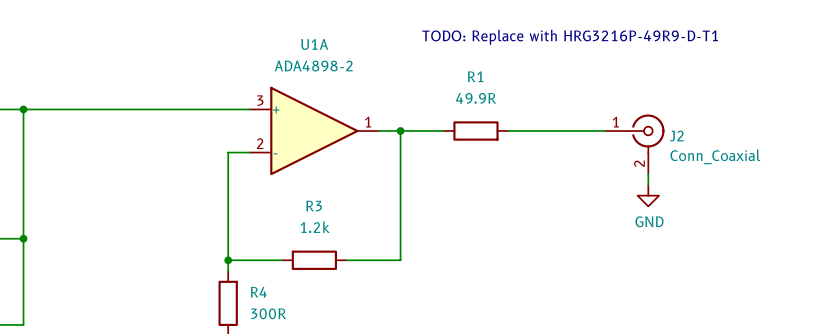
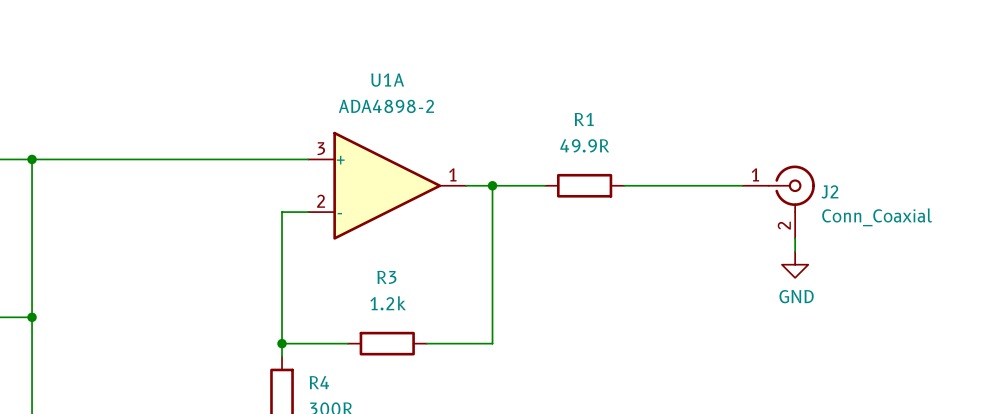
text: TODO: Replace with HRG3216P-49R9-D-T1 (570, 37) -> none

